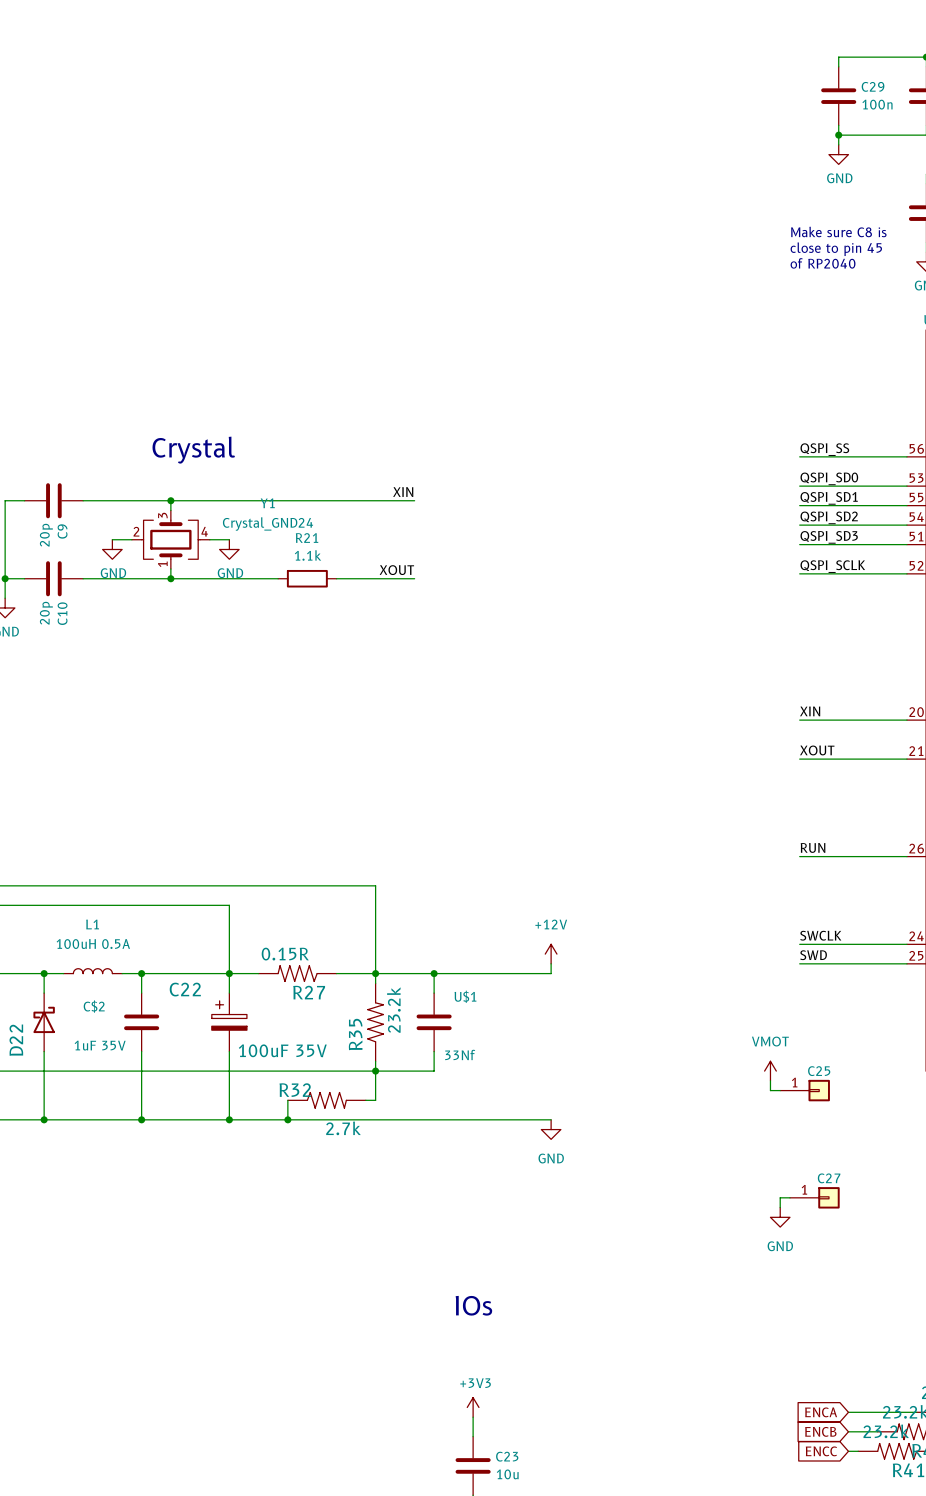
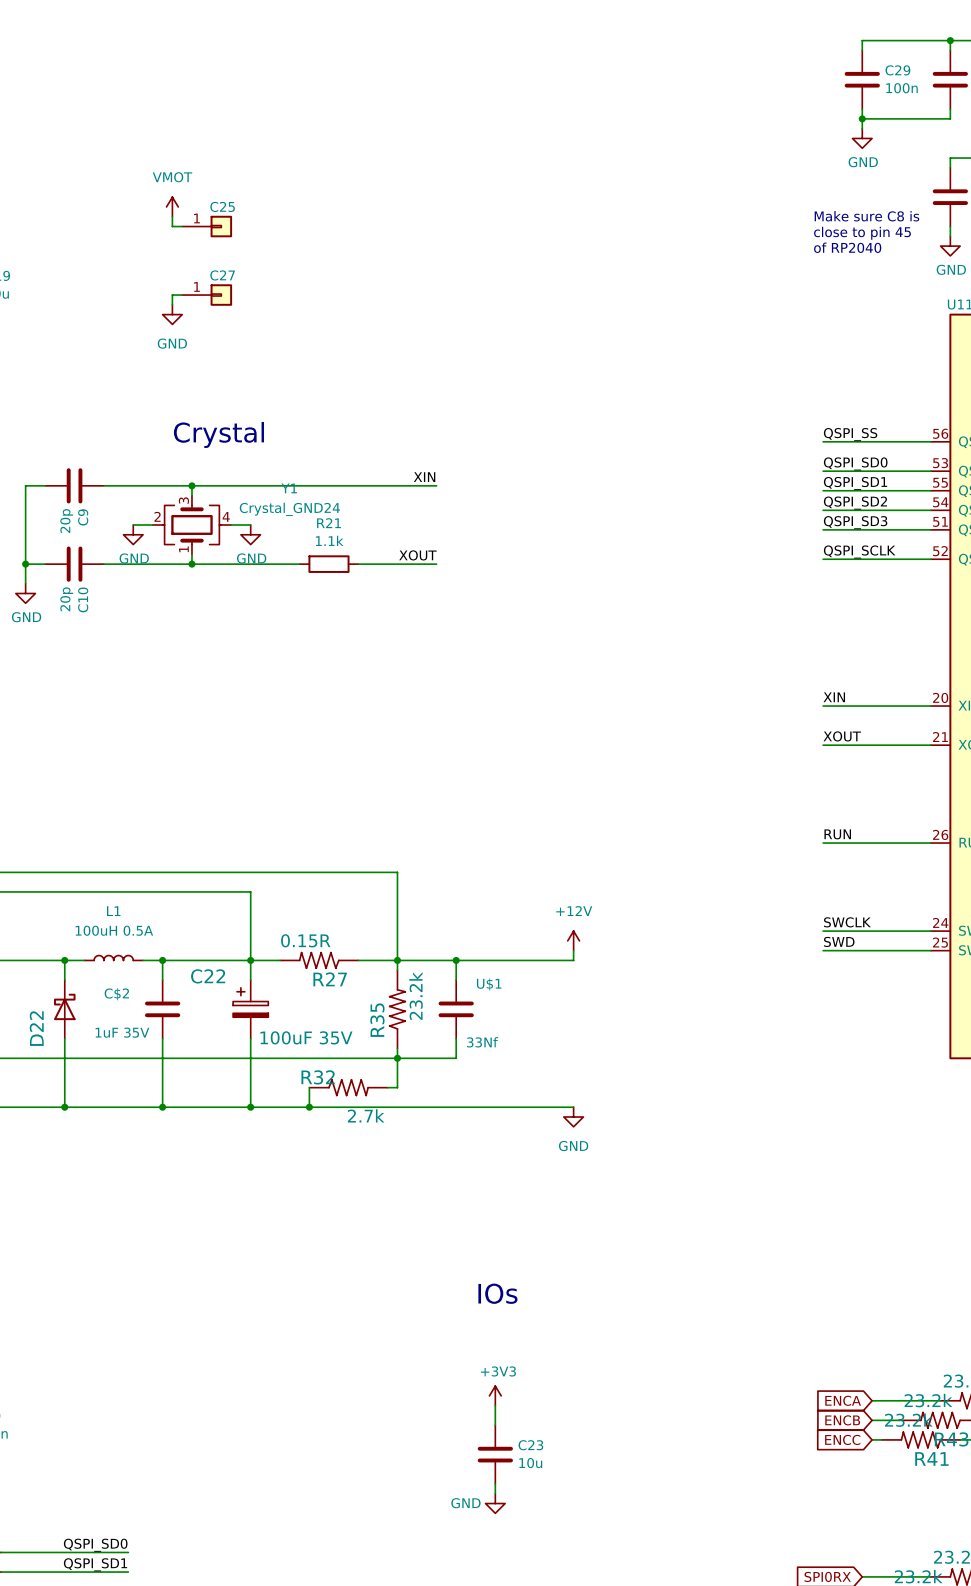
power symbol: none -> VMOT (172, 206)
wire: none -> (172, 216) (172, 226) (182, 226)
wire: none -> (182, 295) (172, 295) (172, 304)
power symbol: none -> GND (172, 314)
power symbol: VMOT (770, 1071) -> none
wire: (770, 1080) (770, 1090) (780, 1090) -> none
C25 position: (805, 1090) -> (207, 226)
wire: (789, 1197) (780, 1197) (780, 1207) -> none
C27 position: (814, 1197) -> (207, 295)
power symbol: GND (780, 1217) -> none

